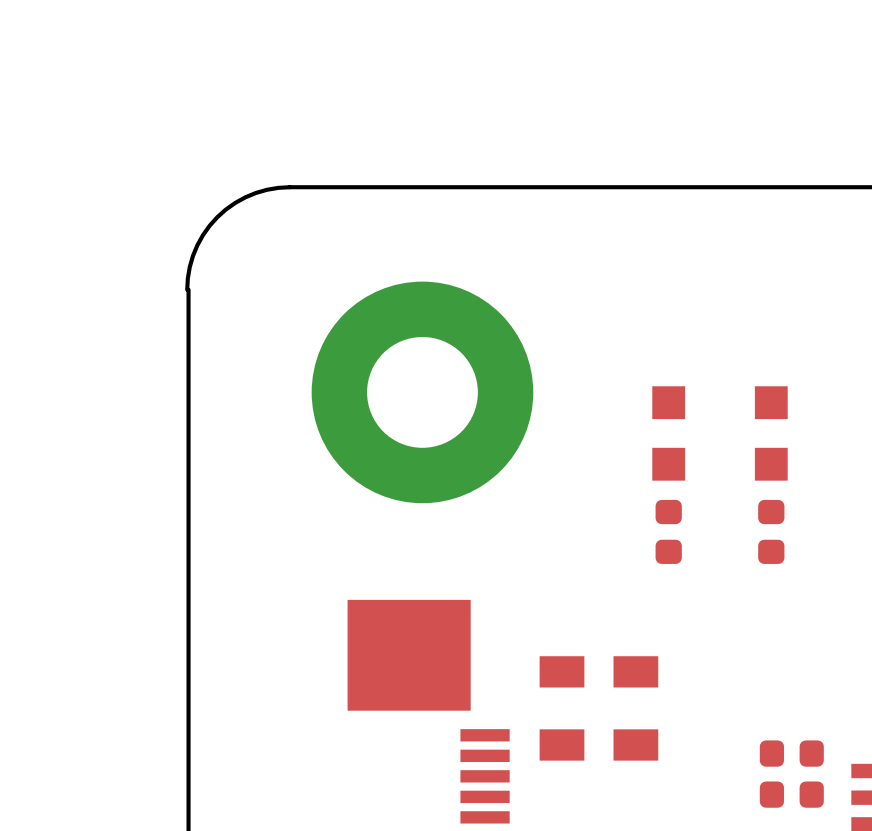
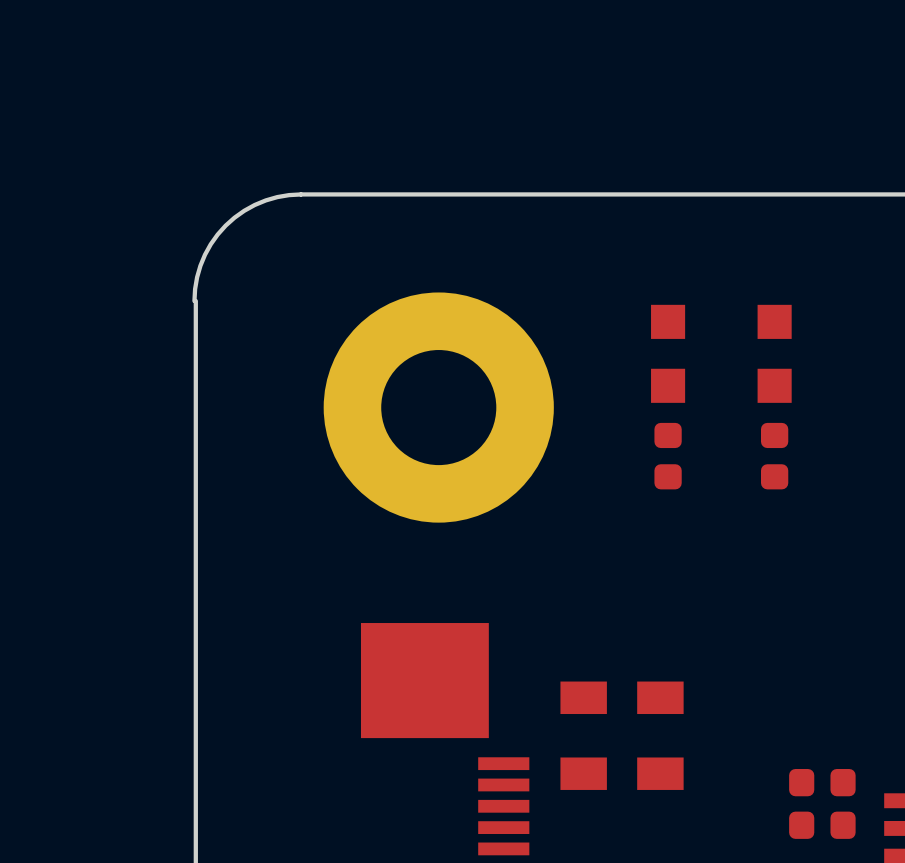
part: none -> (668, 353)
part: none -> (774, 353)
part footprint: [652, 386, 686, 481] -> [654, 422, 682, 490]
part footprint: [754, 386, 788, 481] -> [760, 422, 789, 490]
part: (668, 531) -> none
part: (771, 531) -> none

